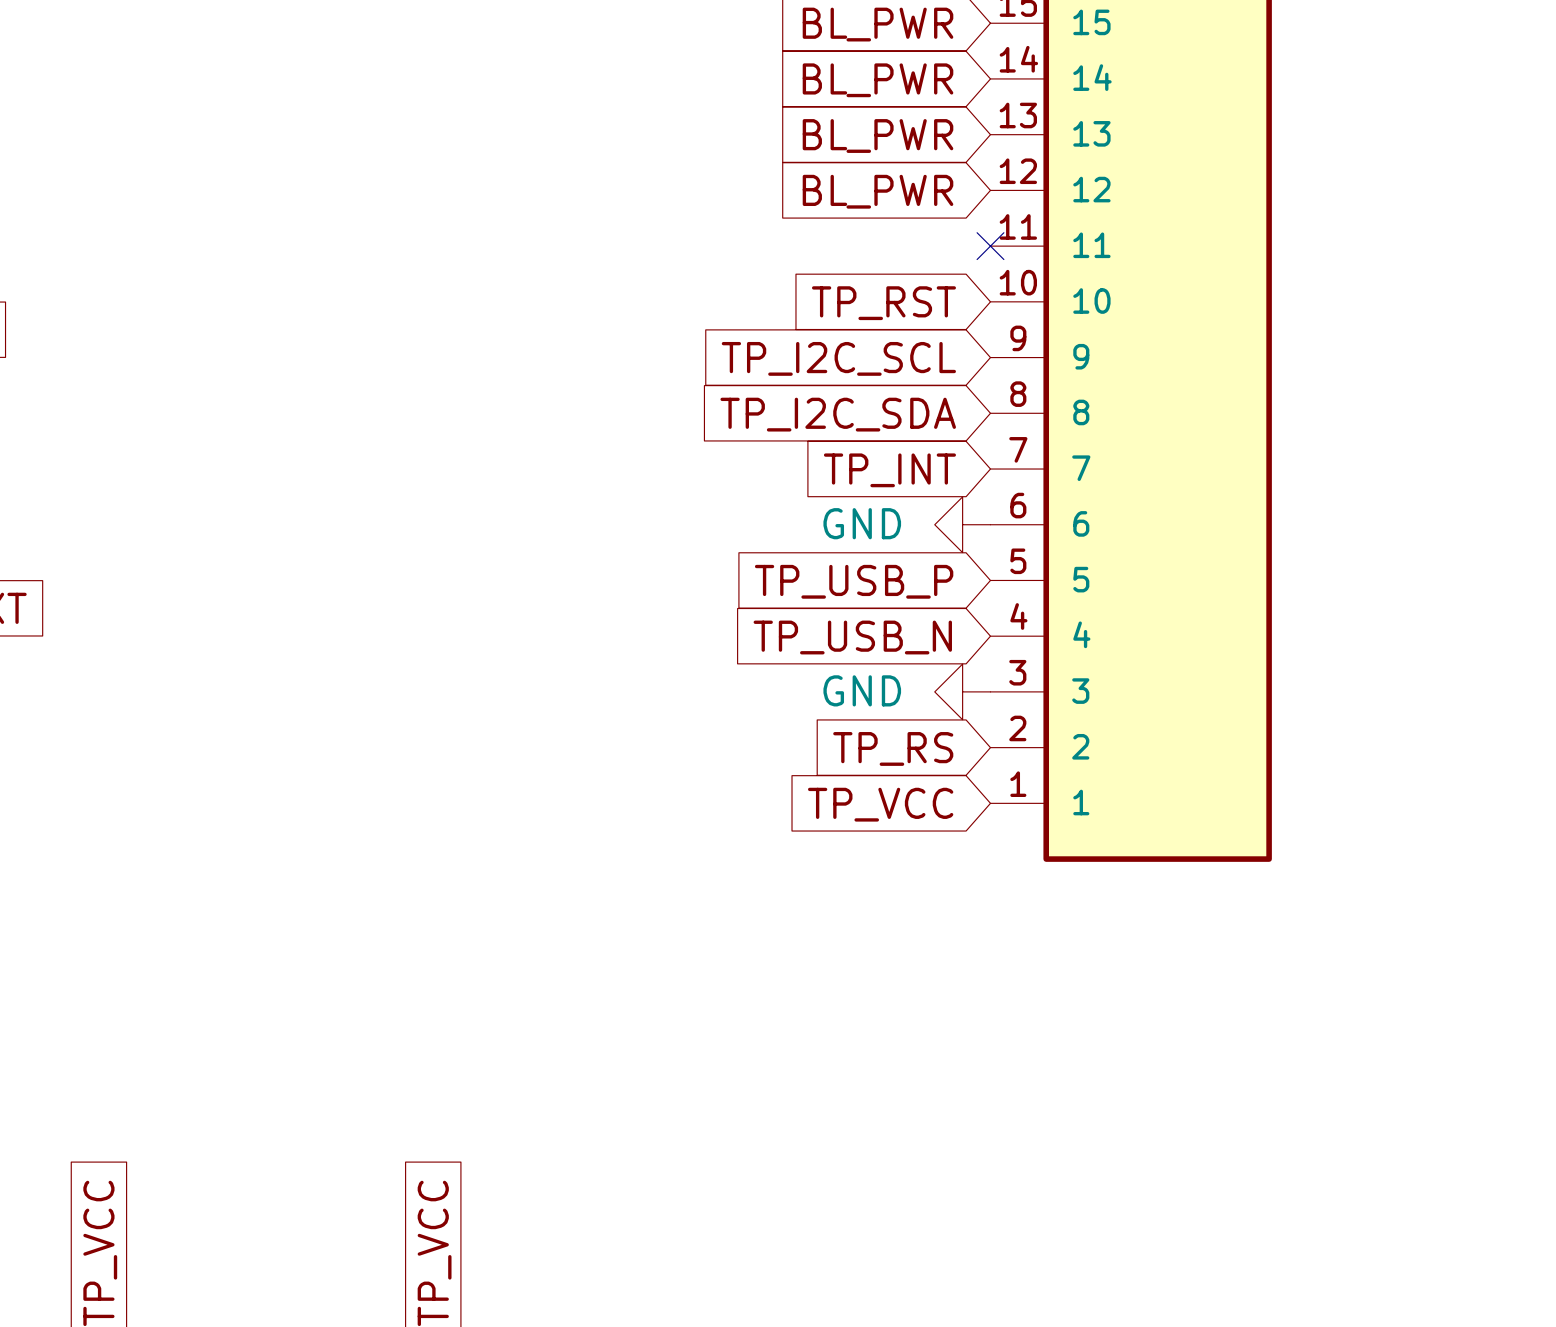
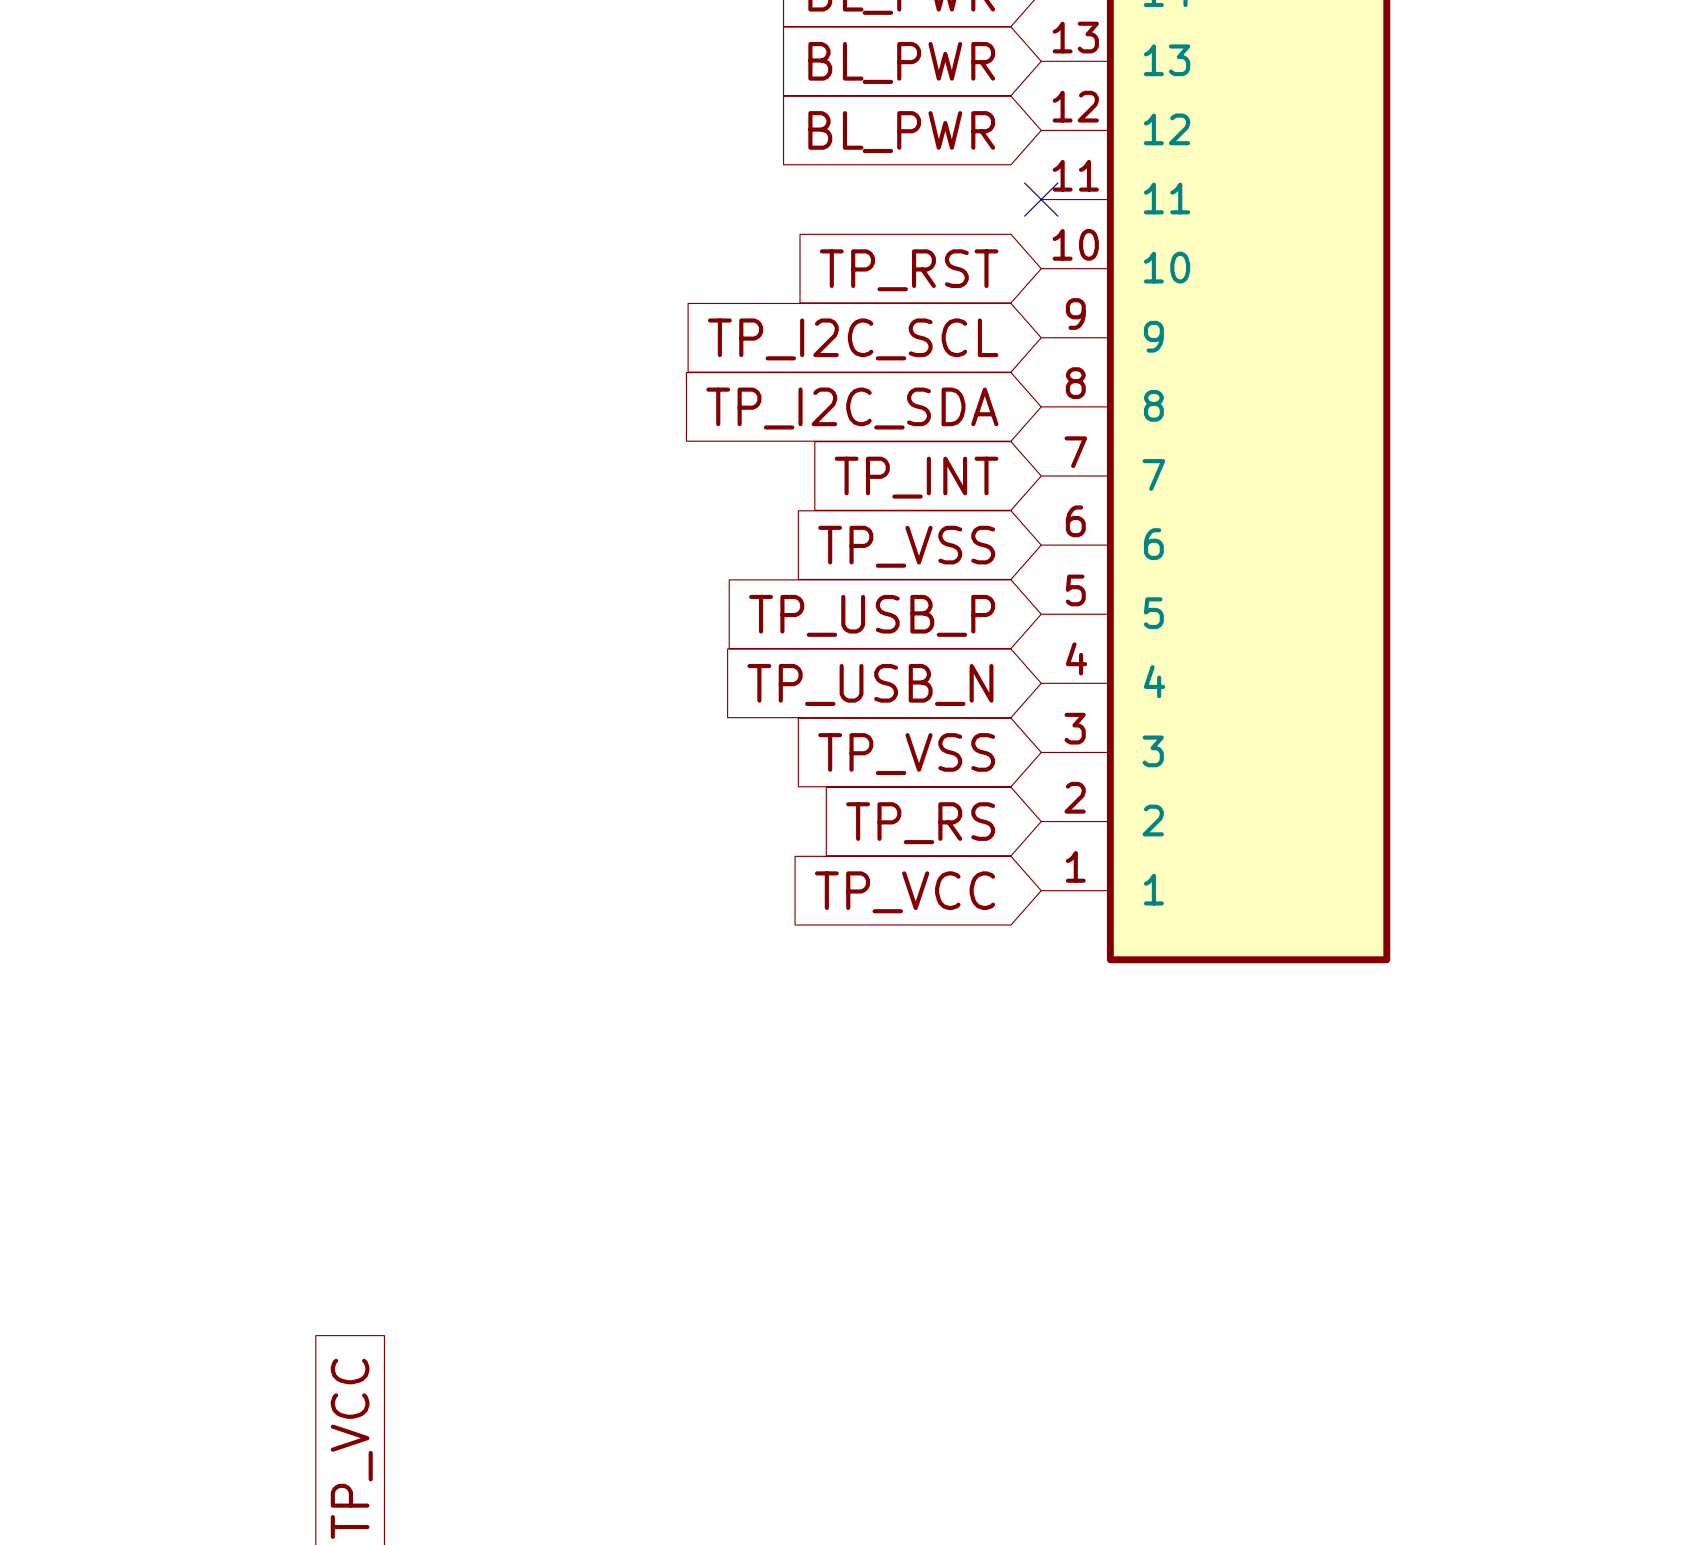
power symbol: GND (962, 524) -> none
global label: none -> TP_VSS (906, 546)
power symbol: GND (962, 691) -> none
global label: none -> TP_VSS (906, 754)

